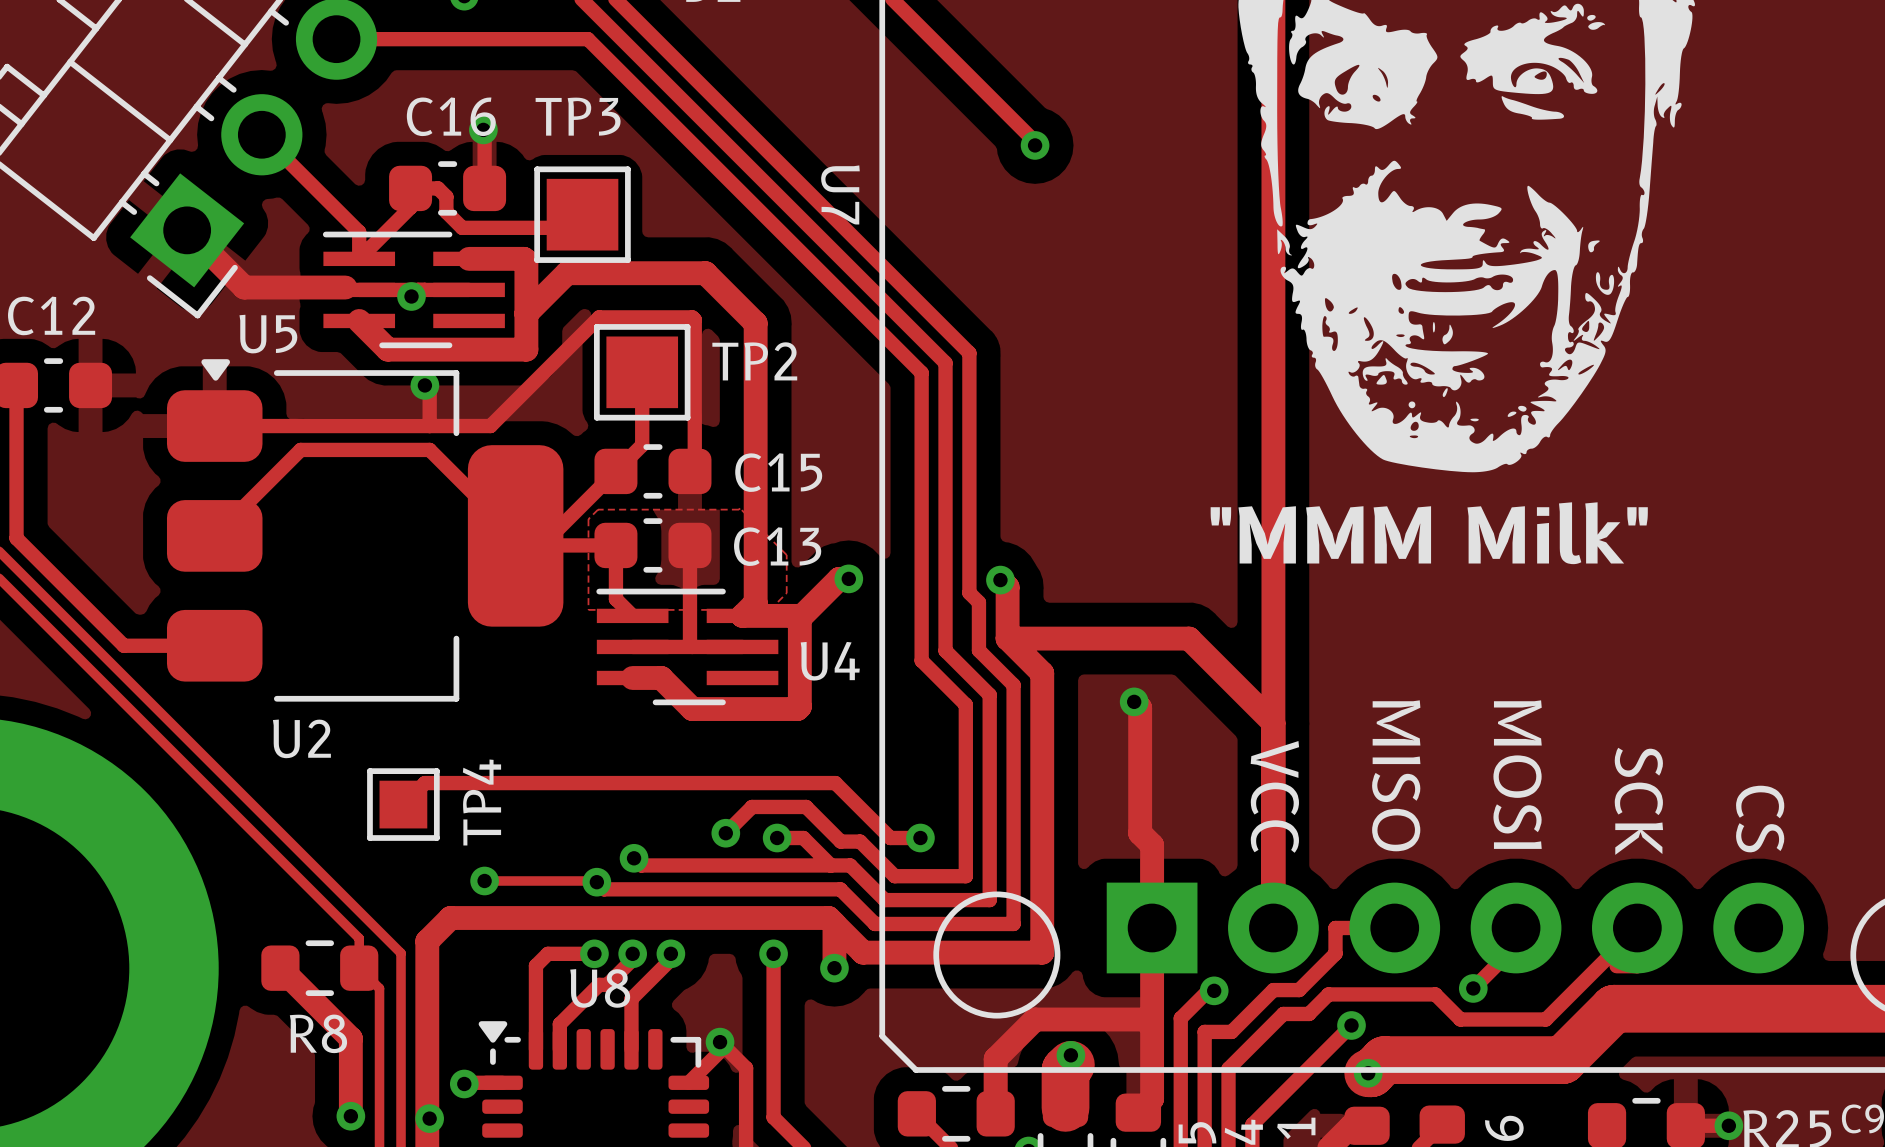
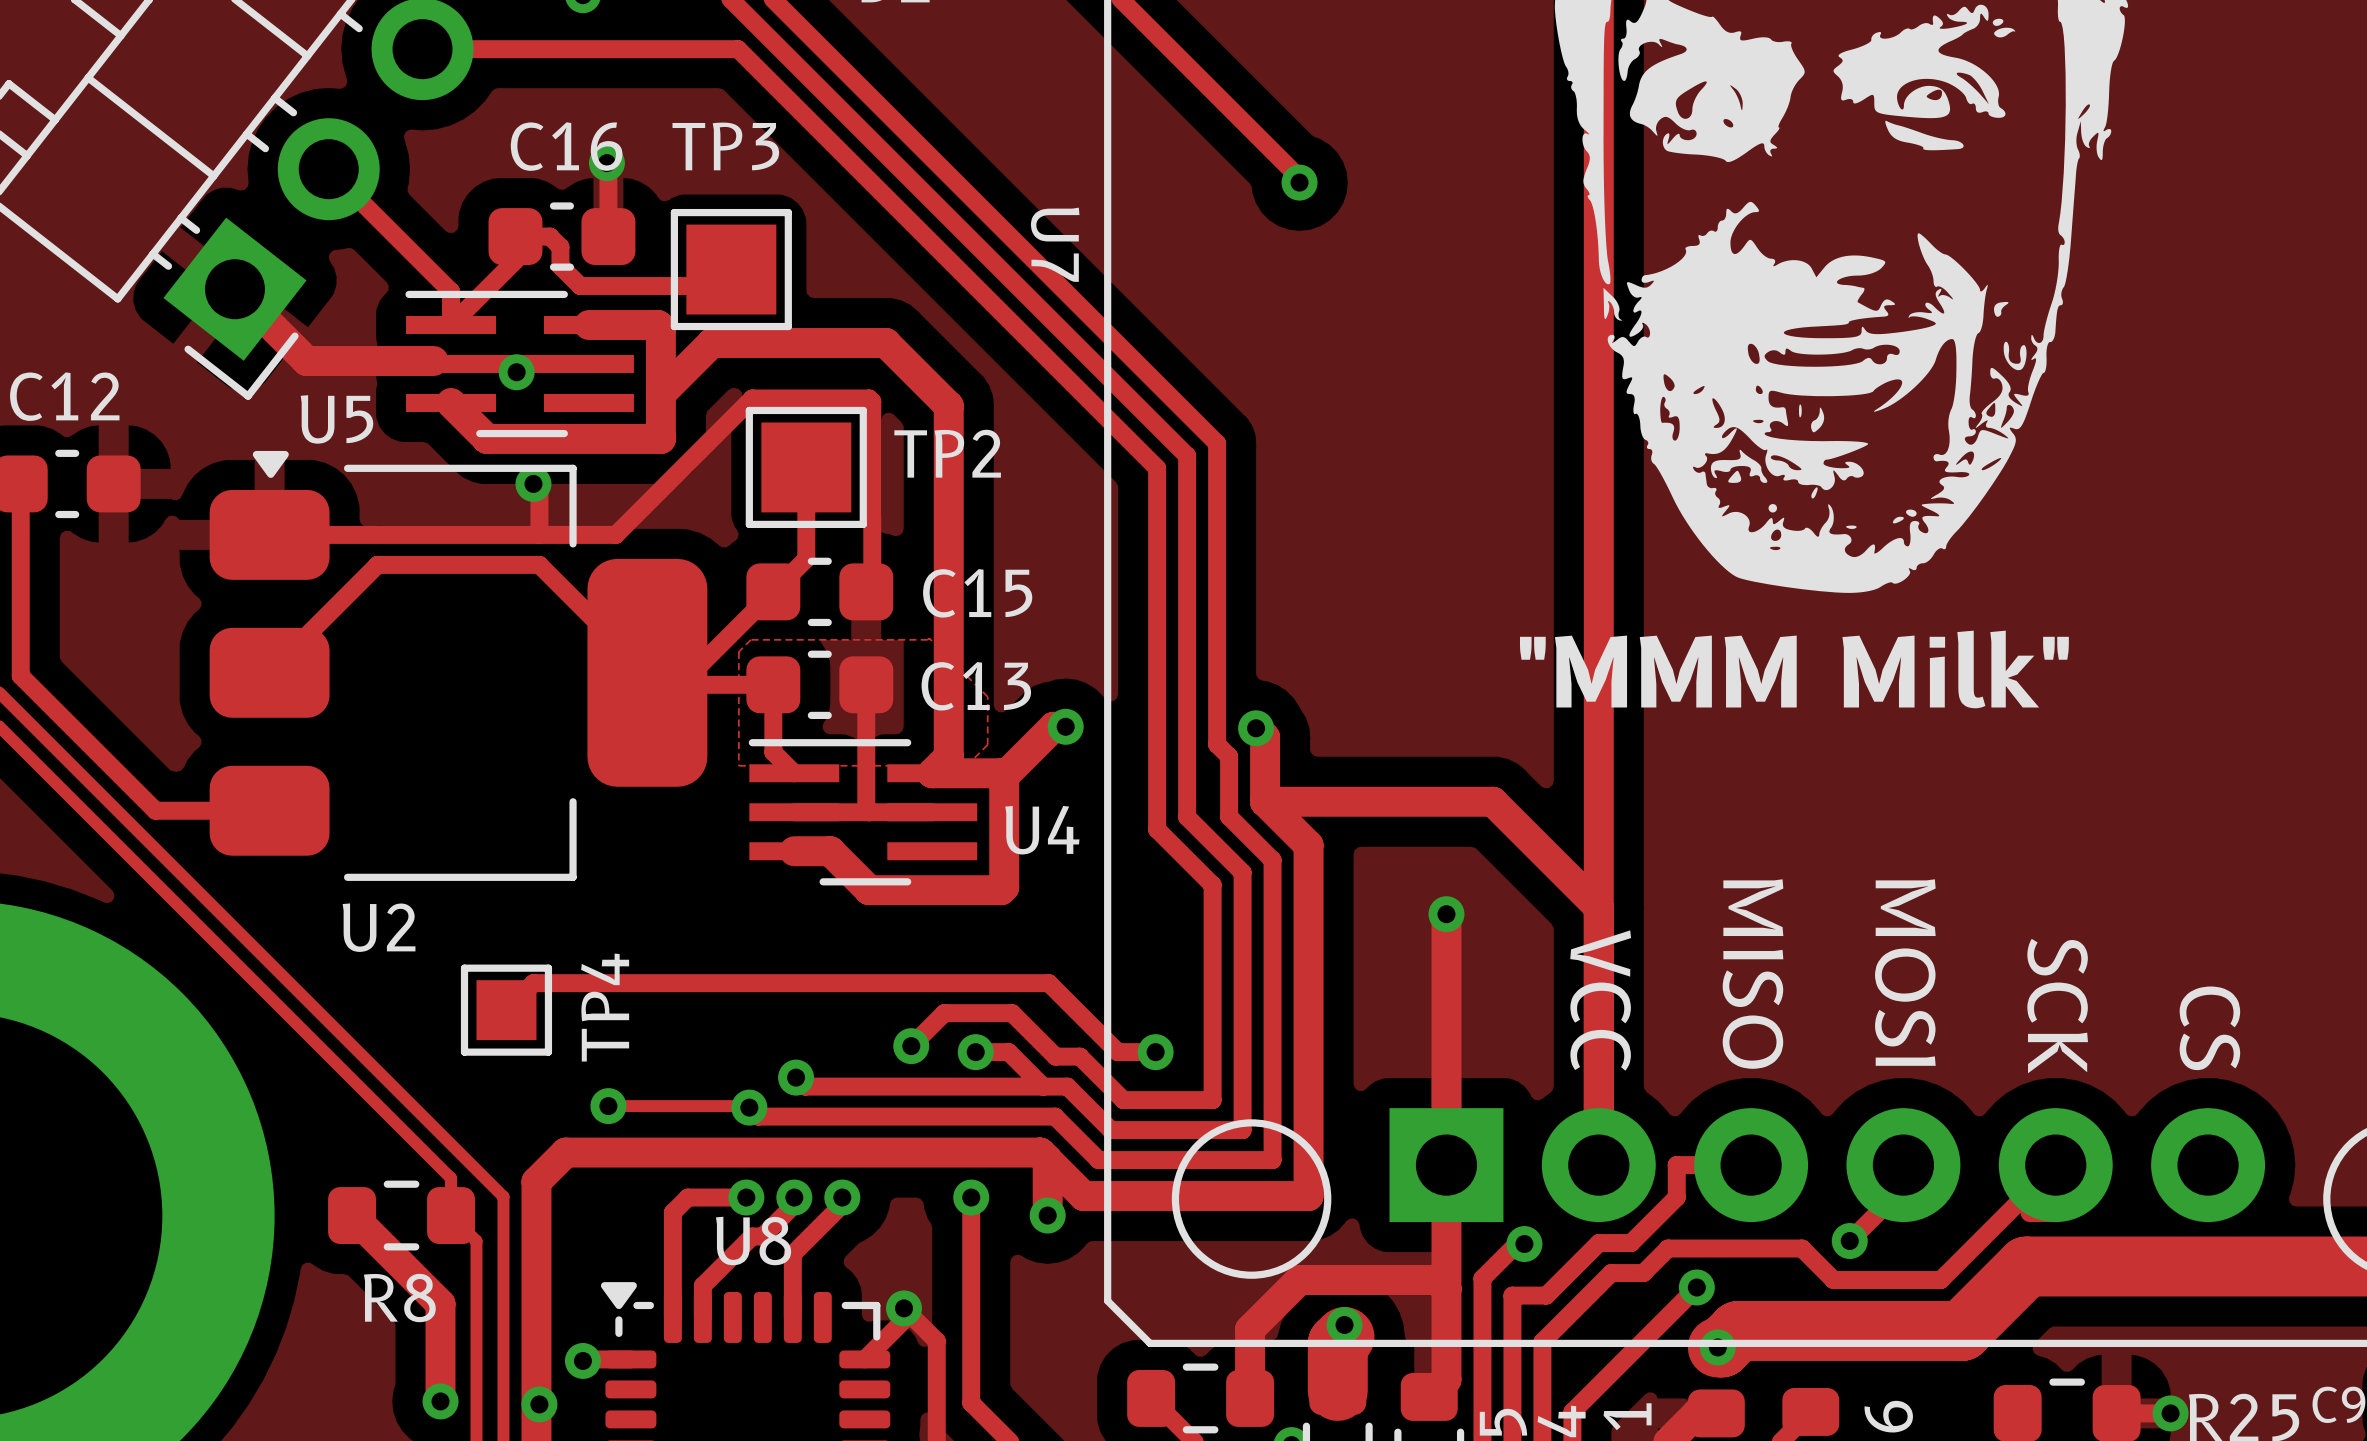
track: (1134, 701) (1140, 707) (1140, 833) (1152, 845) -> (1446, 914) (1446, 1061)
via position: (1134, 701) -> (1446, 914)

